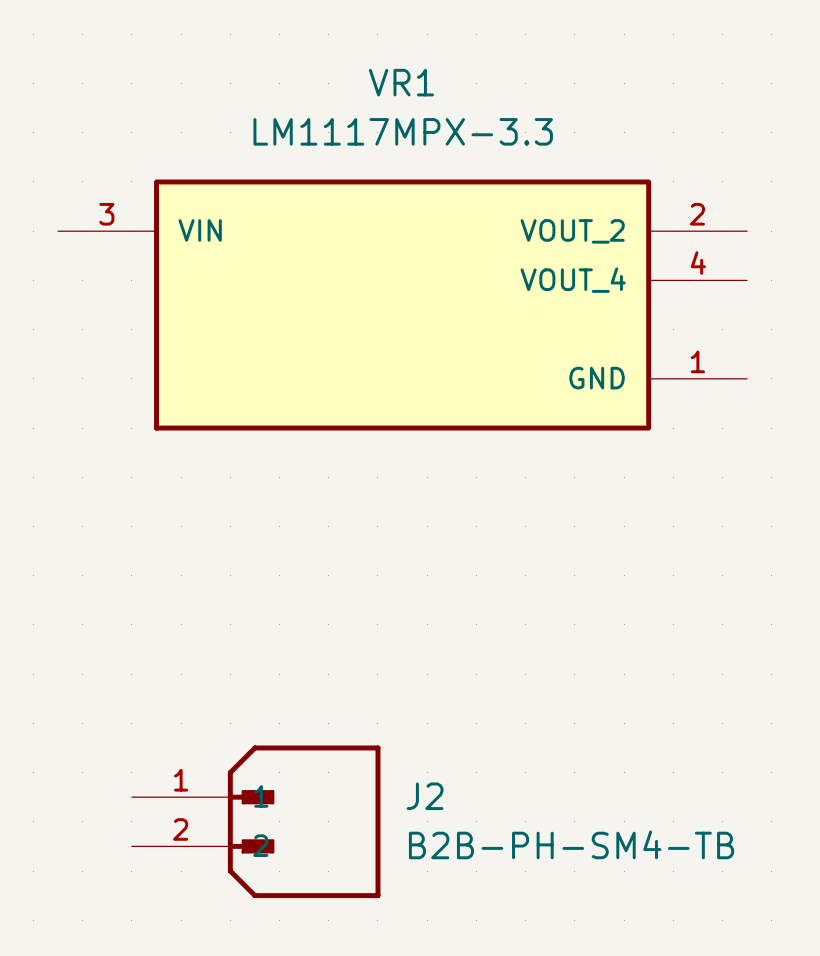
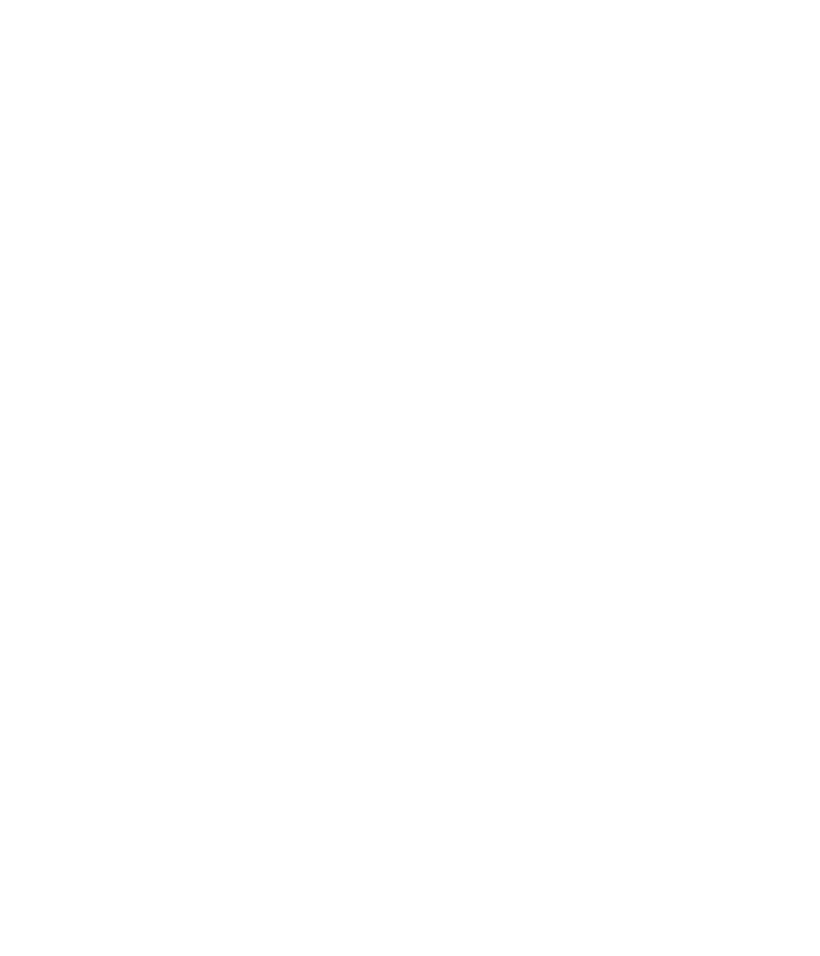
VR1: LM1117MPX-3.3 (402, 305) -> none
J2: B2B-PH-SM4-TB (256, 821) -> none

